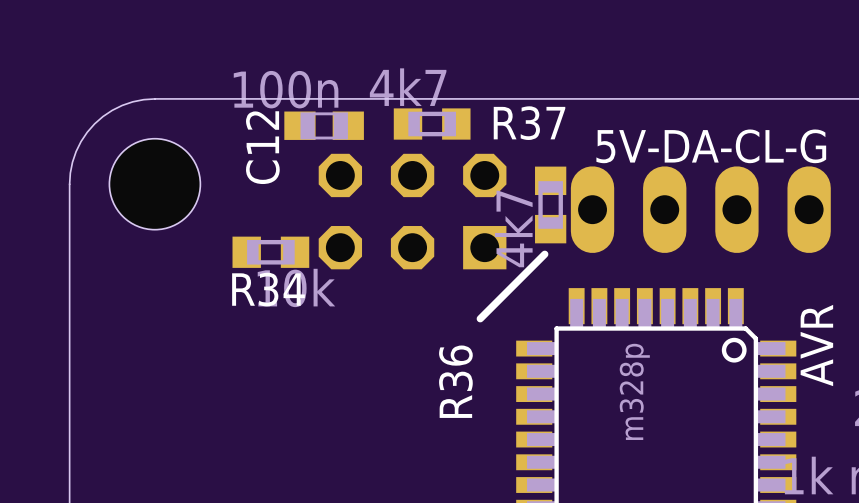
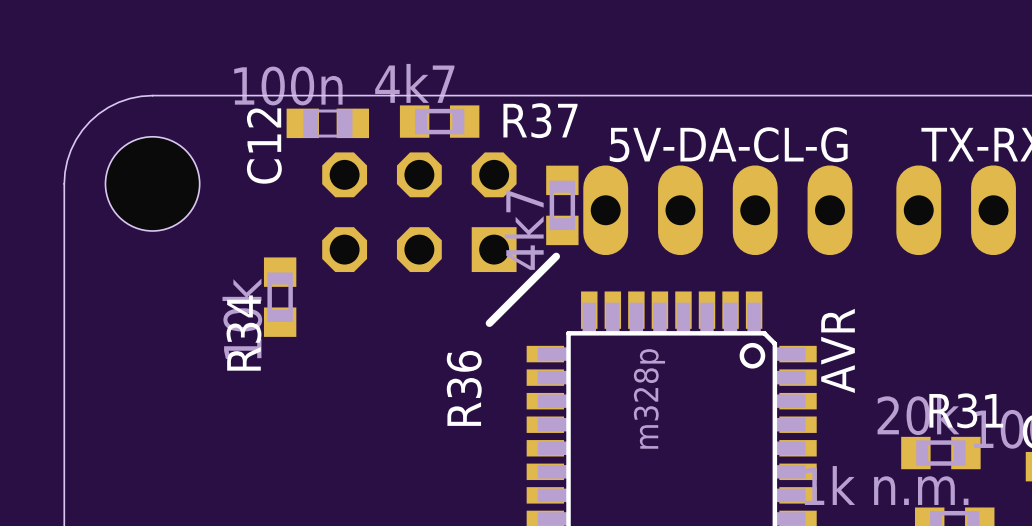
R34 rotation: 0° (270, 252) -> 90° clockwise (280, 297)

